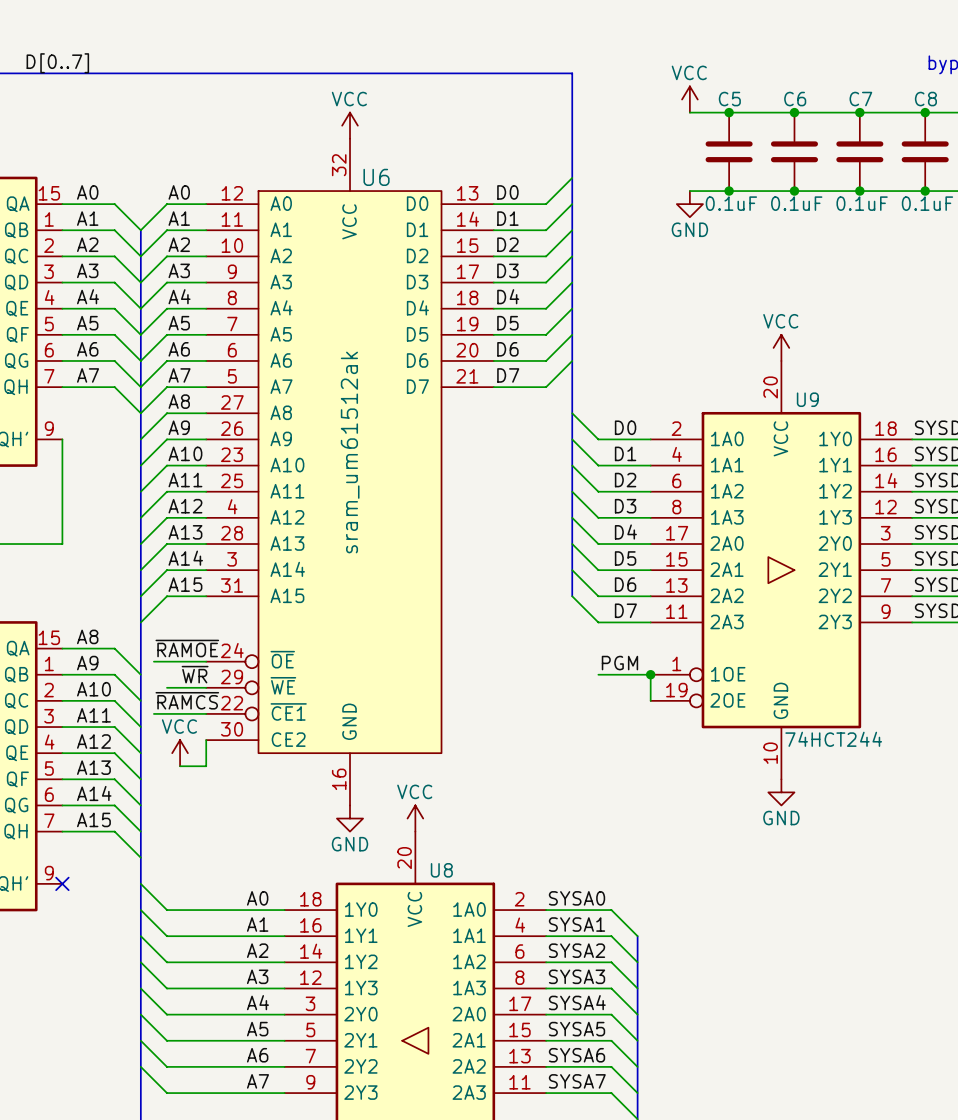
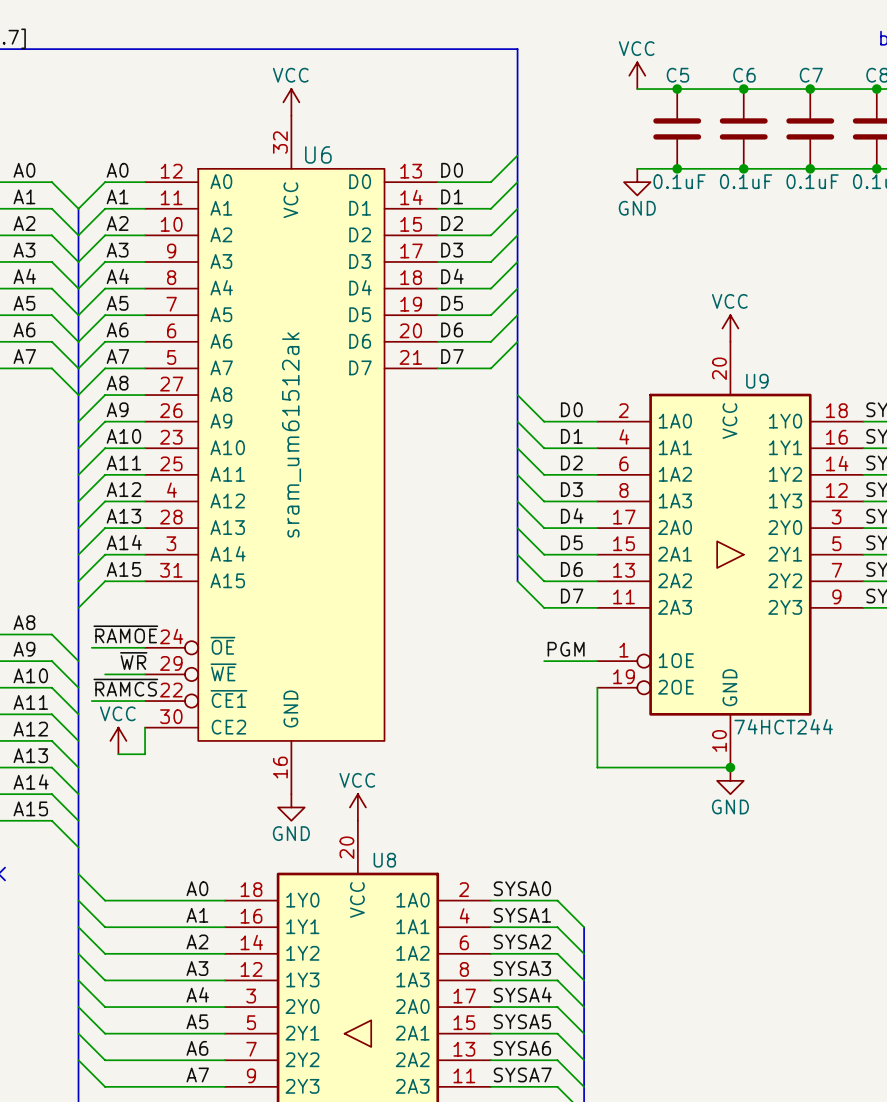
wire: (650, 674) (650, 700) -> (730, 767) (597, 767) (597, 687)
junction: (650, 674) -> none
junction: none -> (730, 767)

